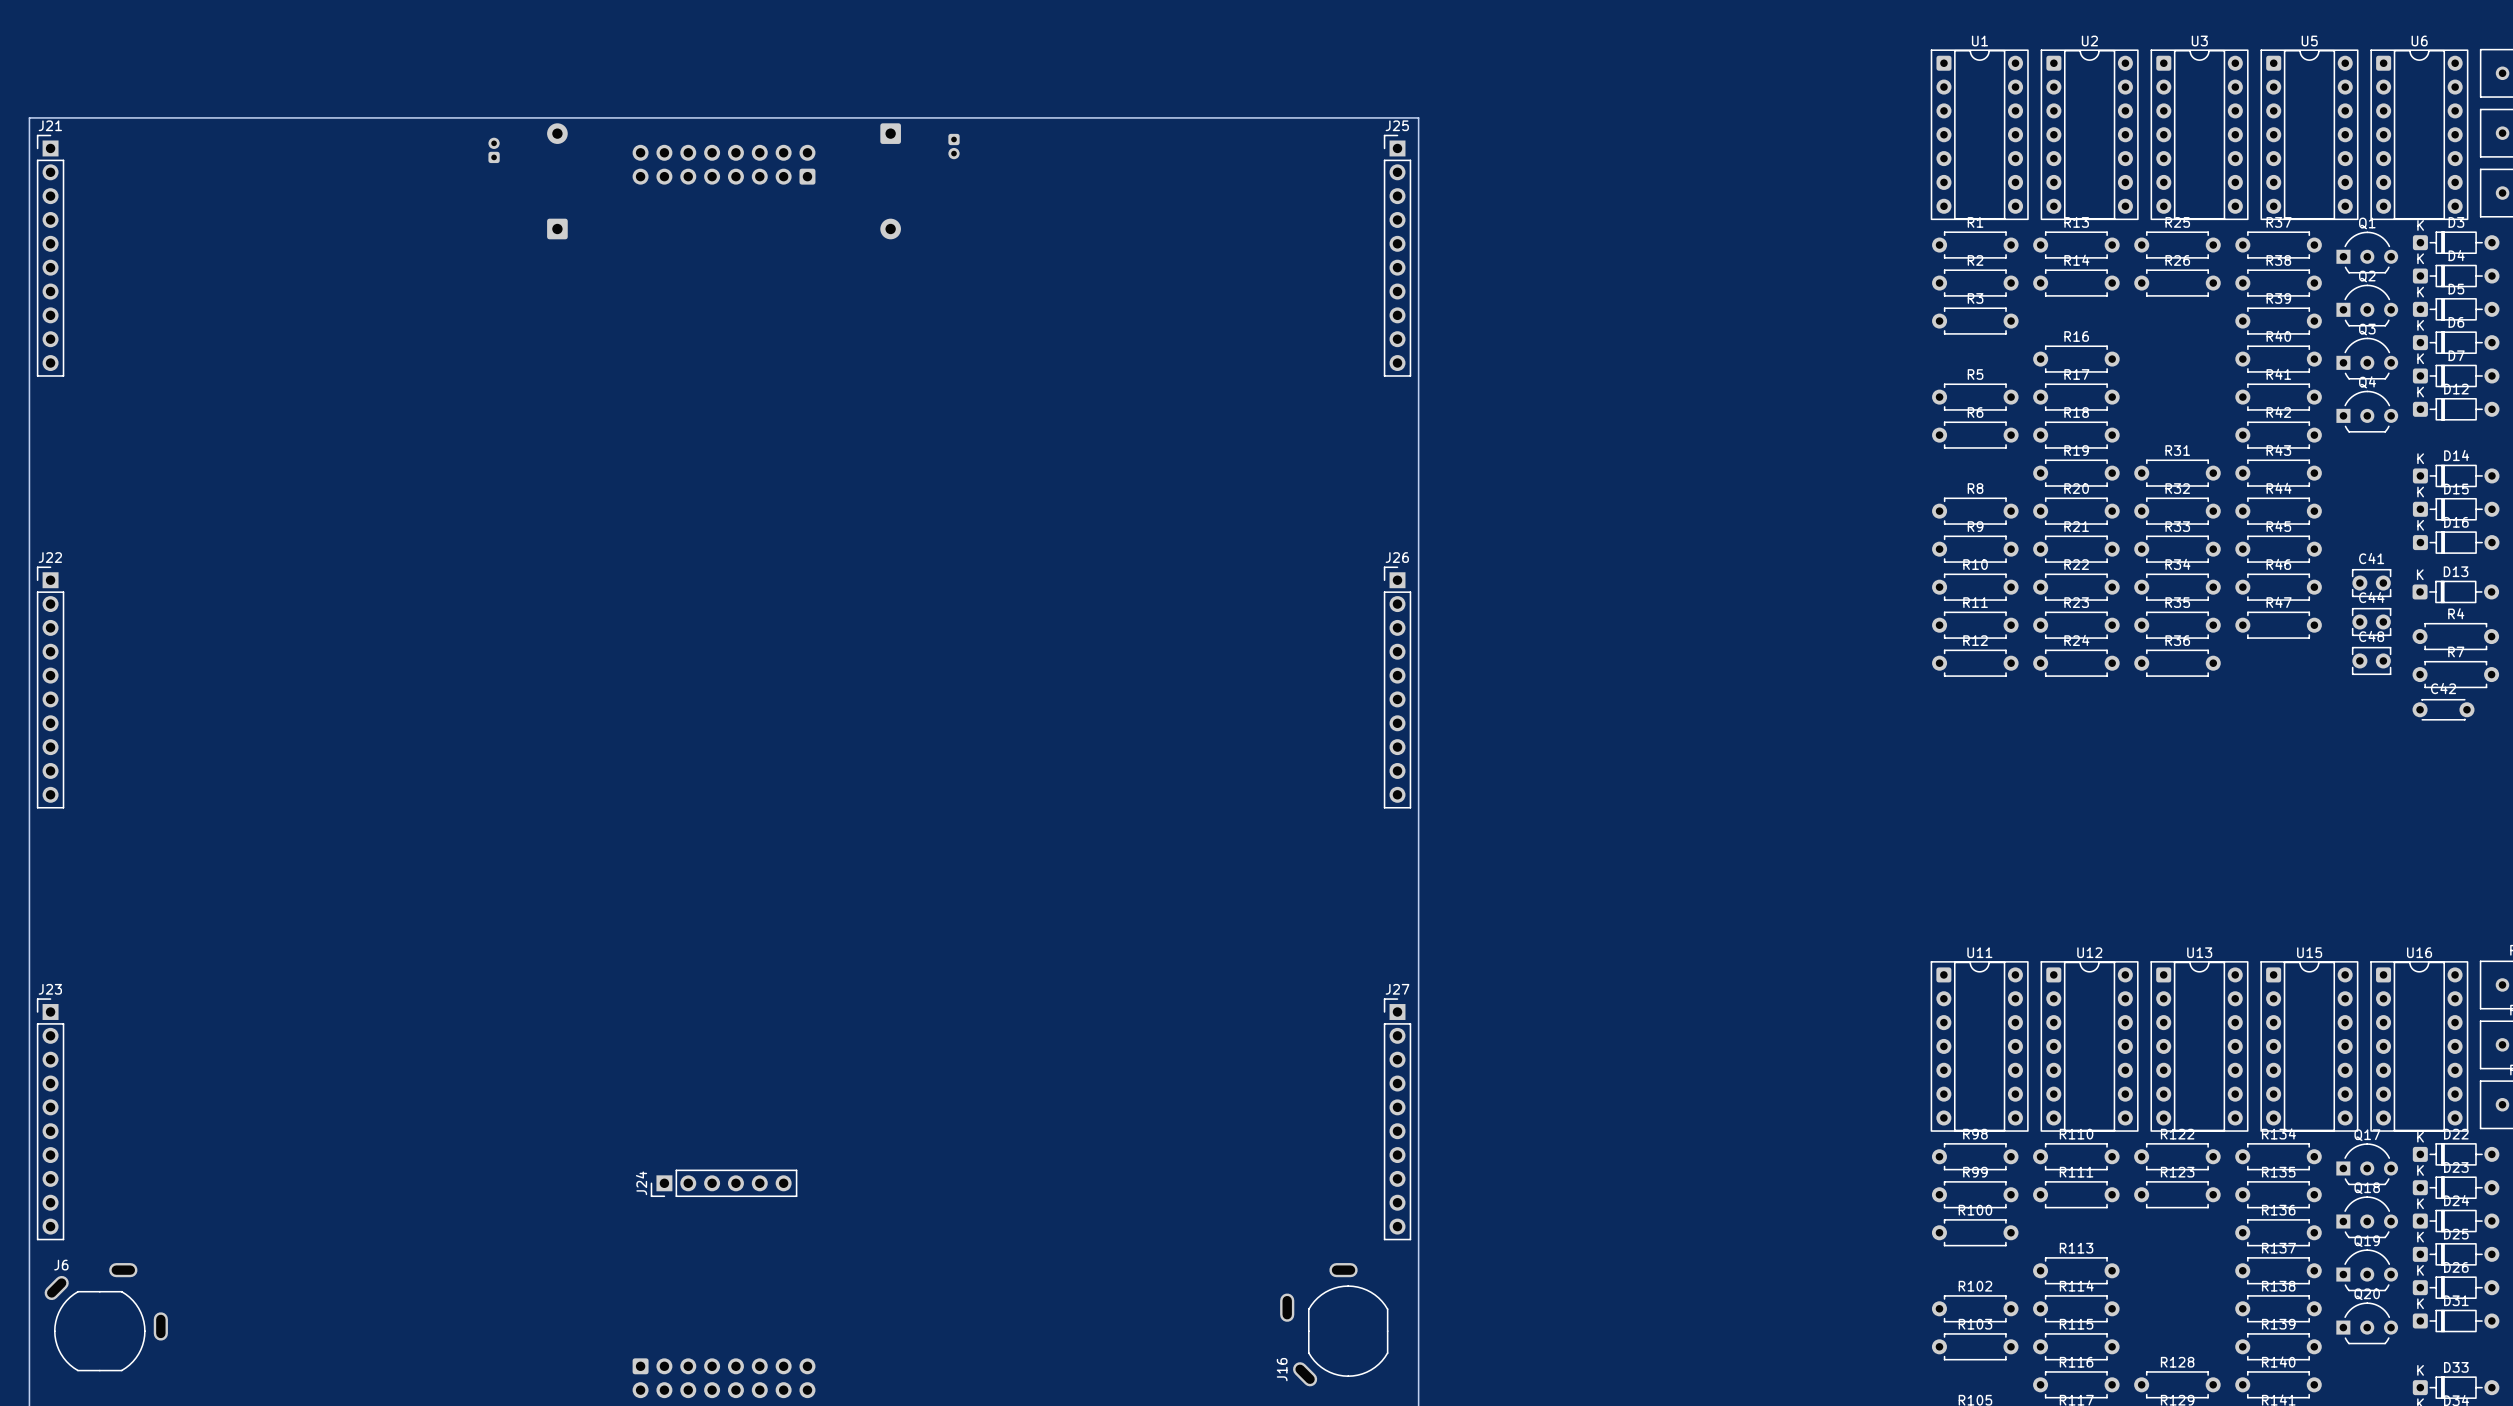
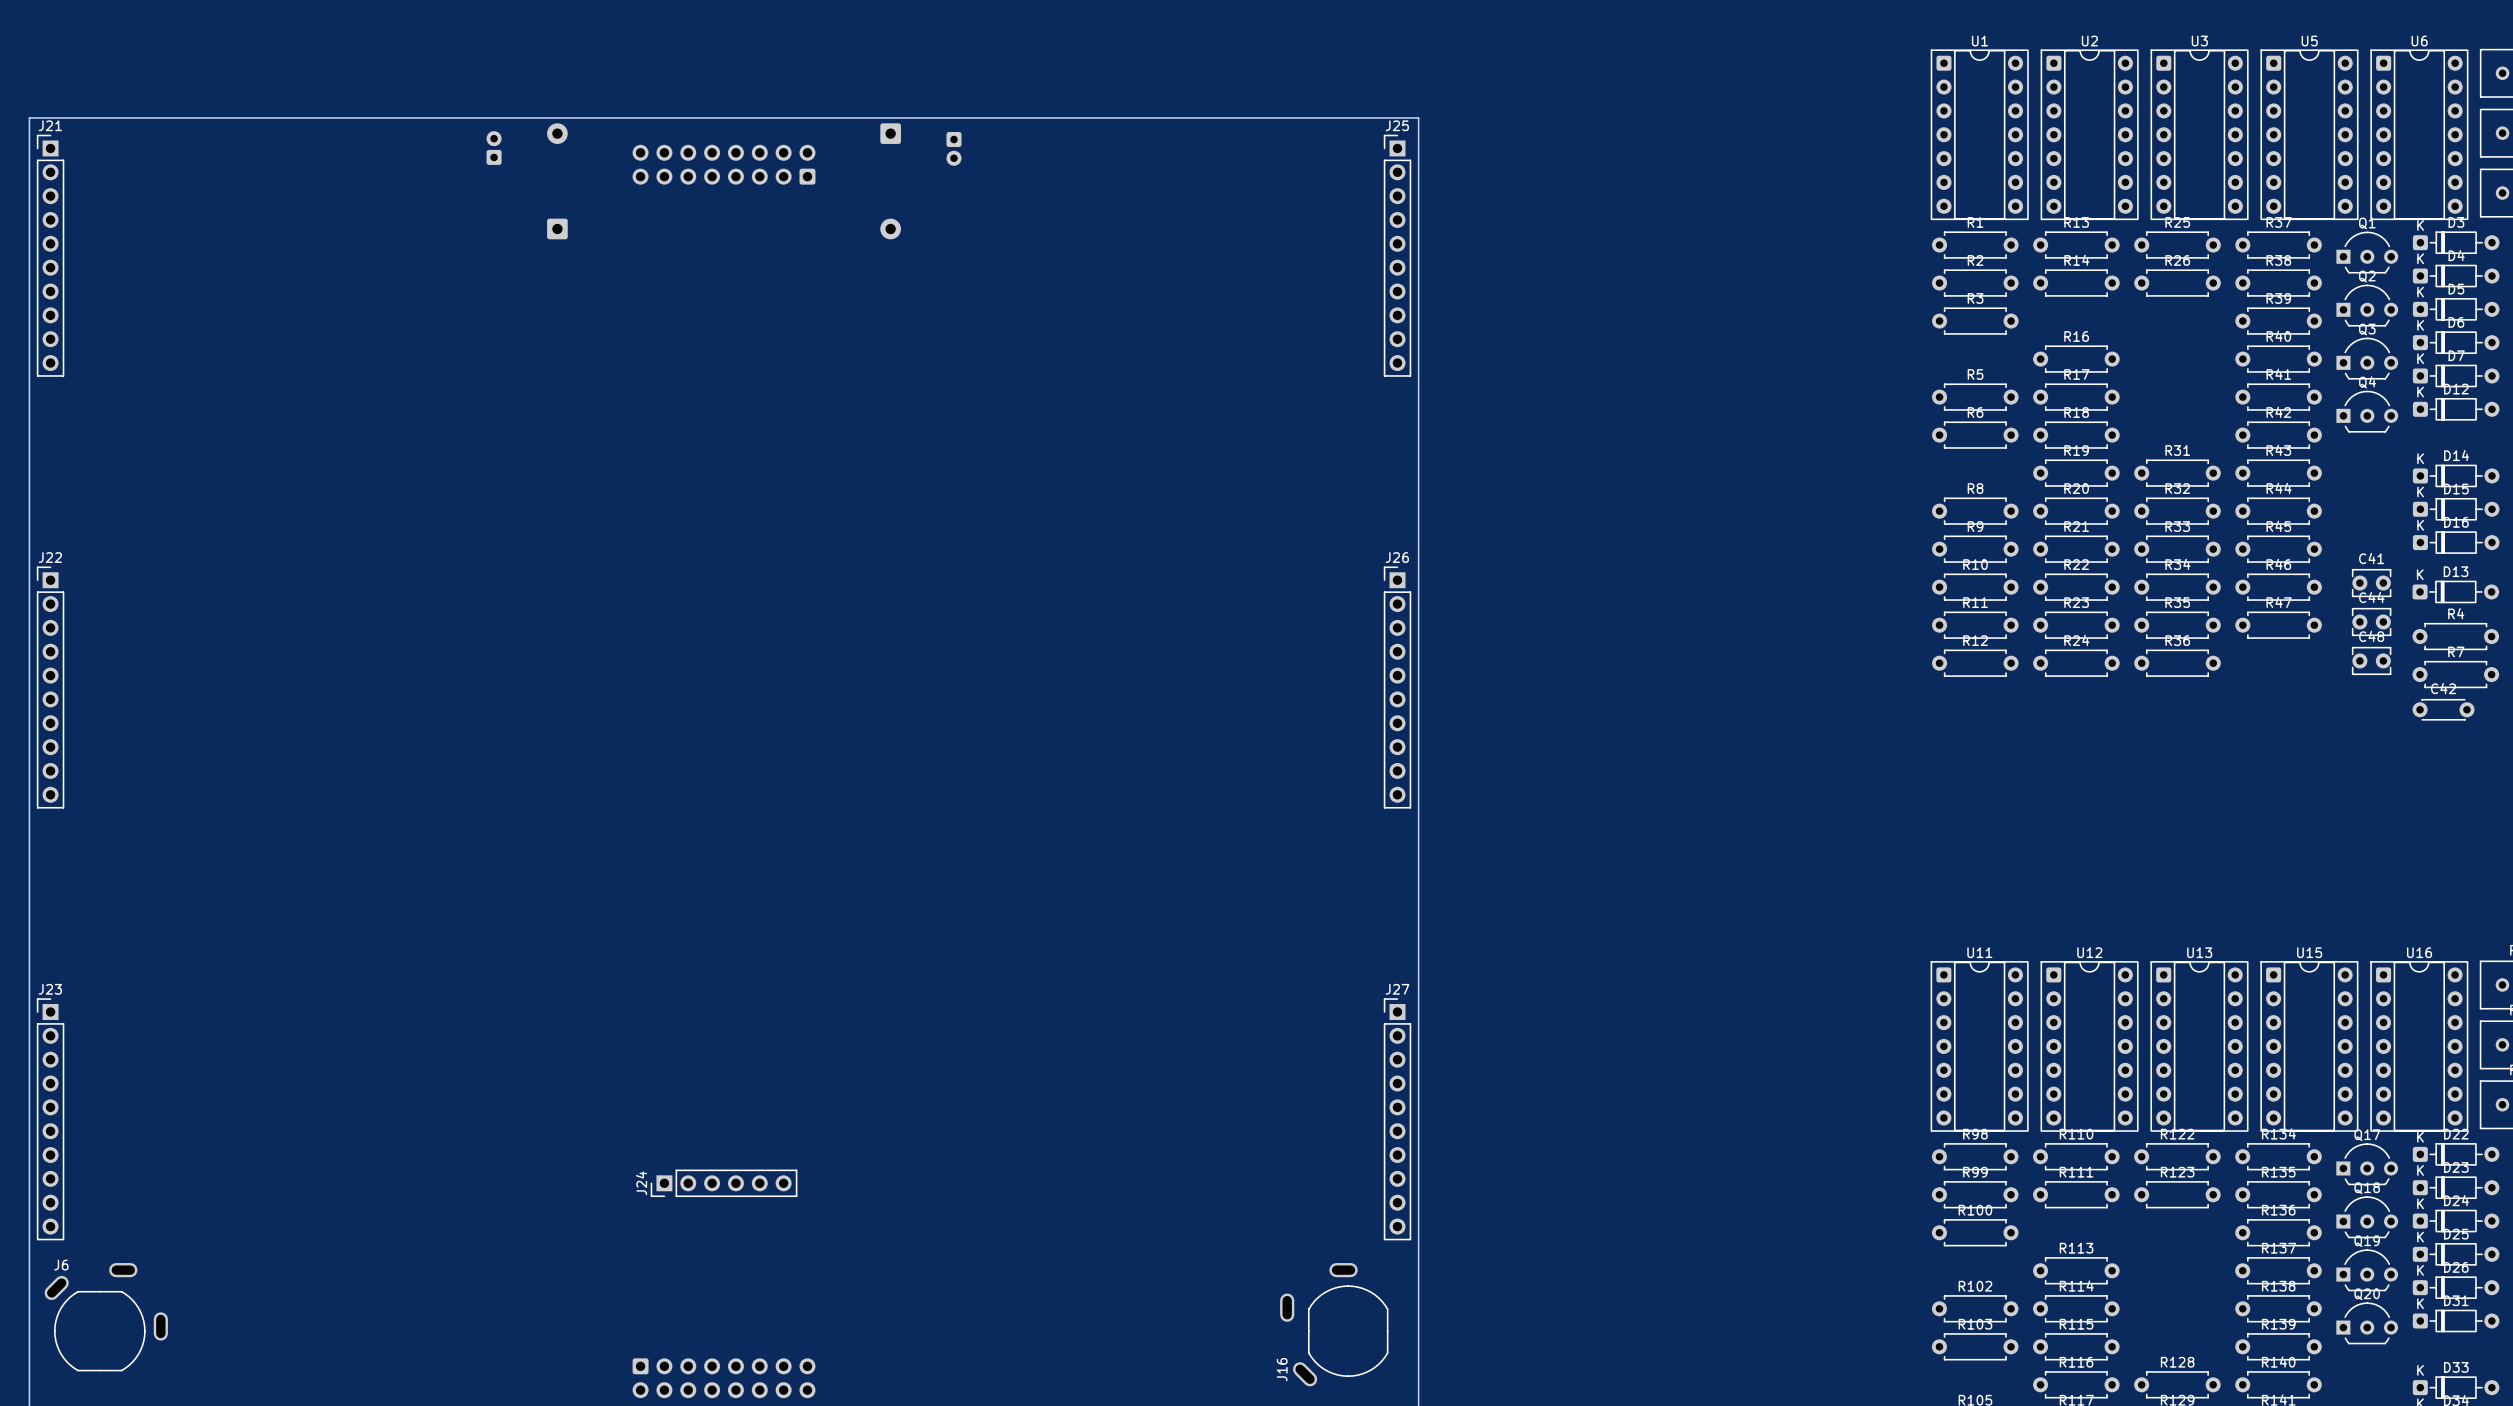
part footprint: [948, 133, 960, 160] -> [946, 131, 962, 166]
part footprint: [488, 137, 500, 164] -> [486, 131, 502, 165]

